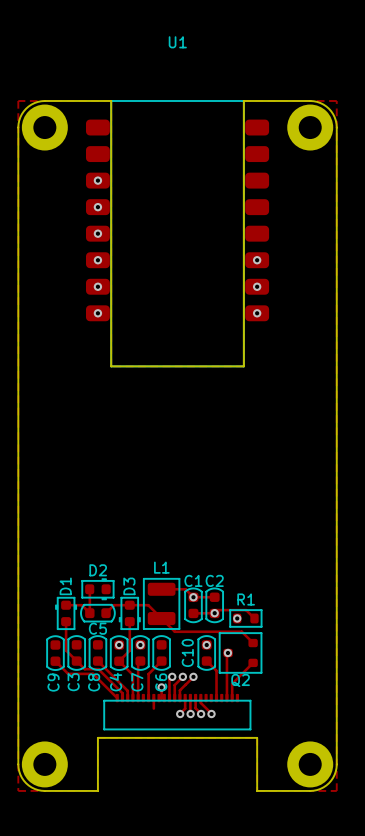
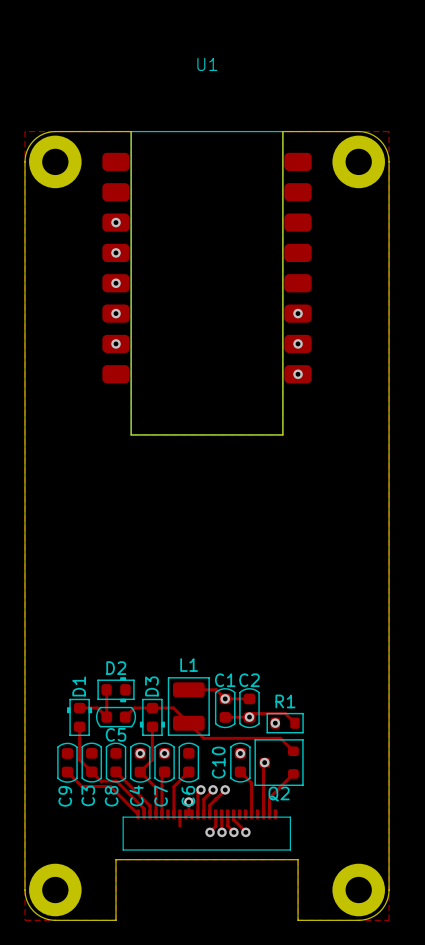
via: (97, 313) -> none

